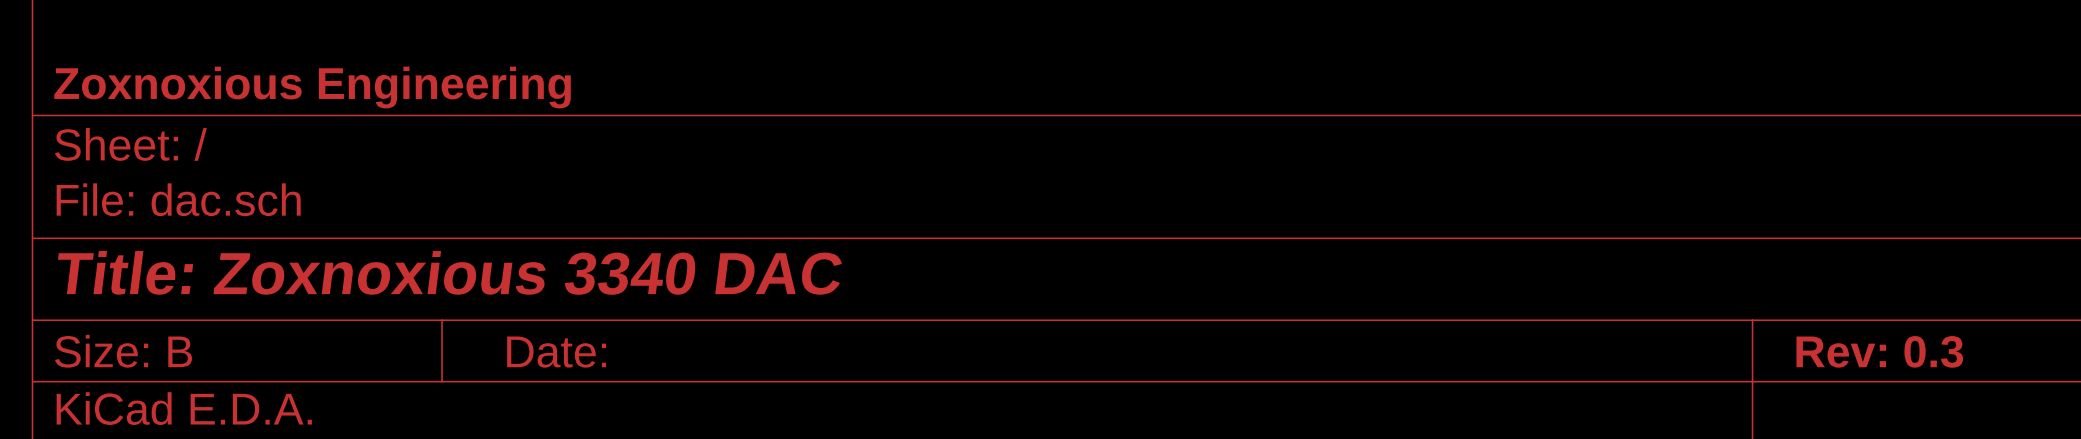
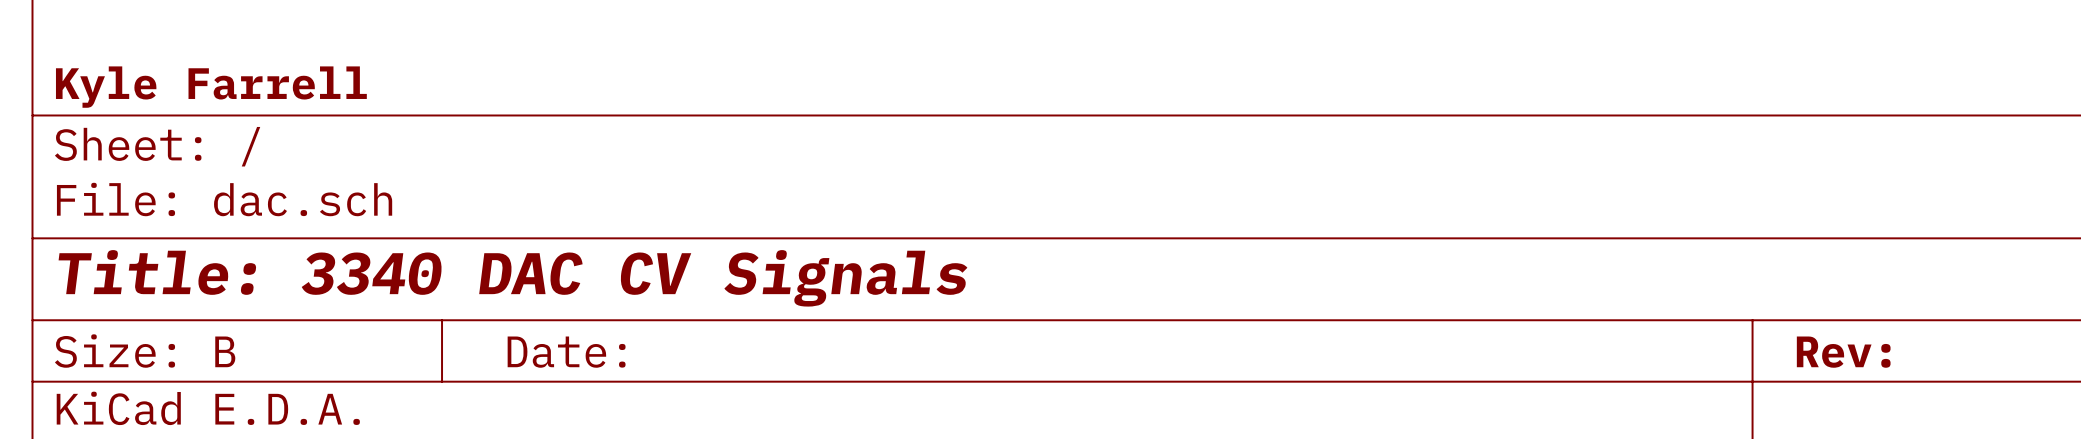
title block: Zoxnoxious Engineering (312, 87) -> Kyle Farrell (211, 87)
title block: Title: Zoxnoxious 3340 DAC (449, 272) -> Title: 3340 DAC CV Signals (512, 278)
title block: Rev: 0.3 (1879, 351) -> Rev: (1843, 352)

